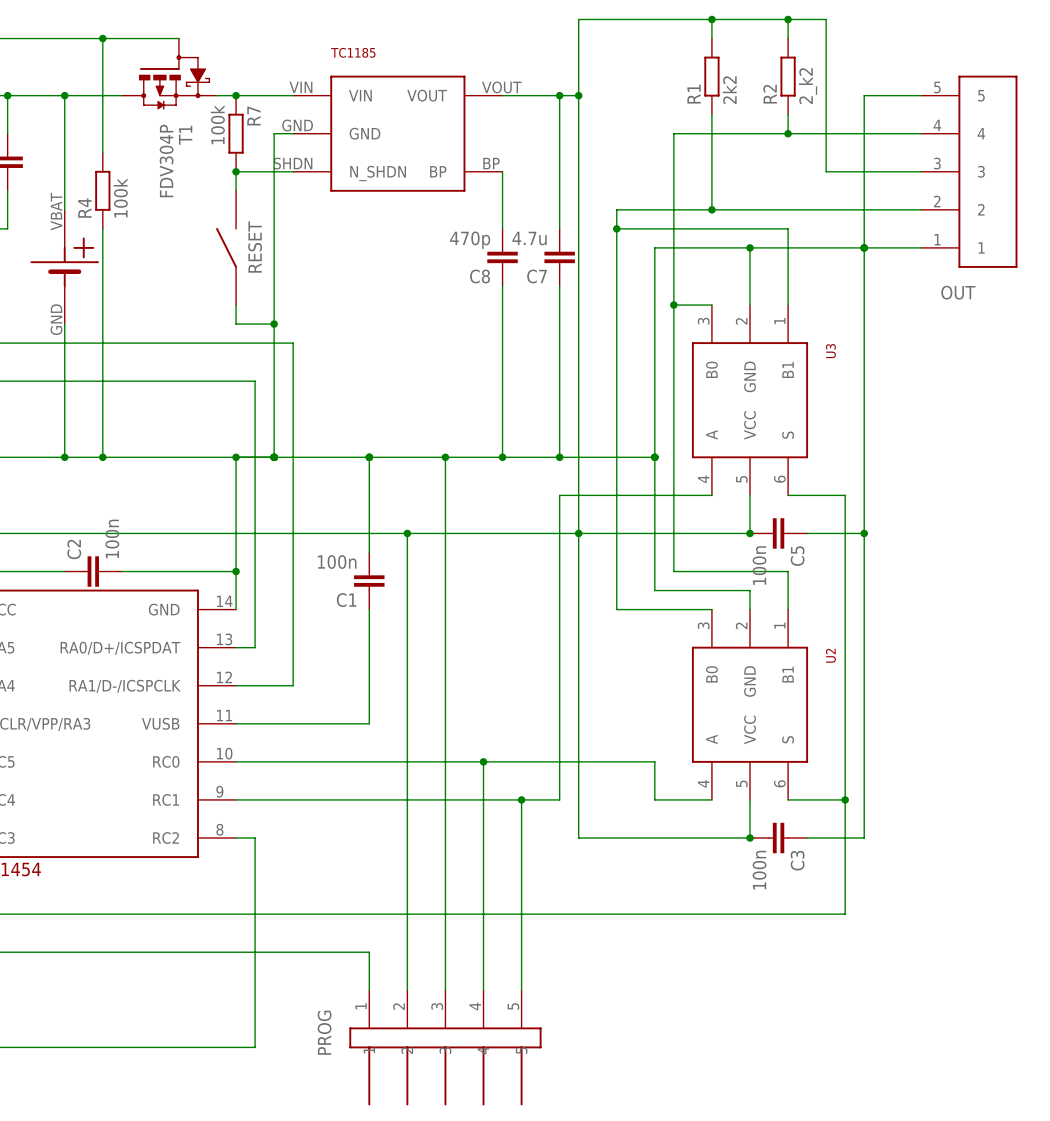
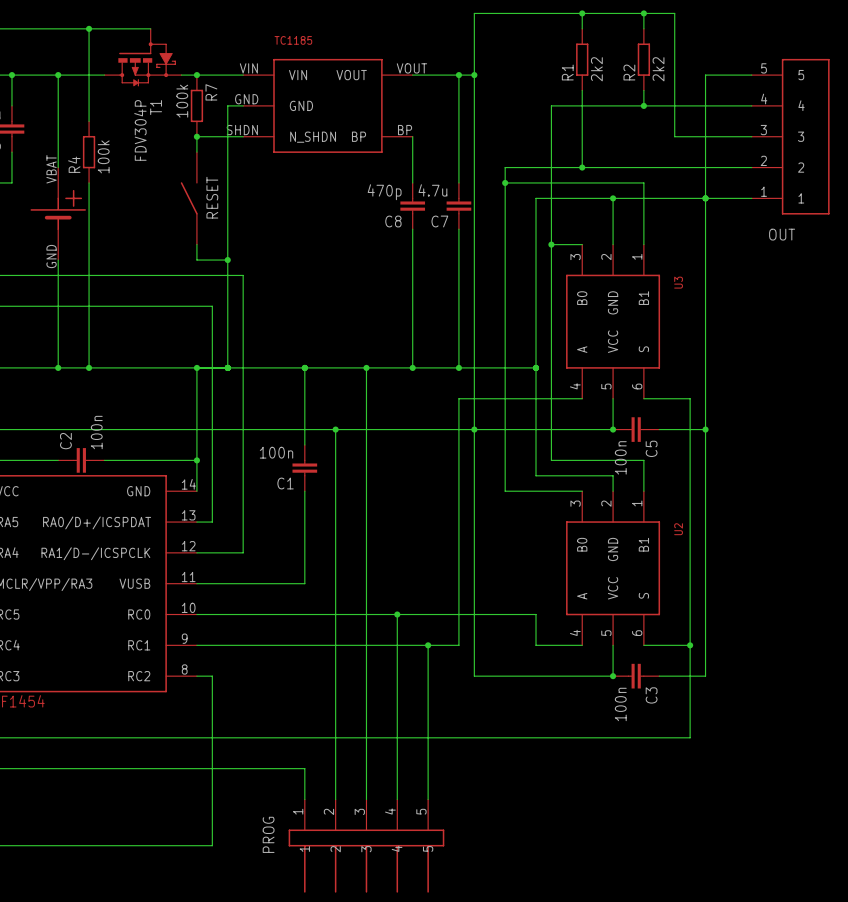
R2 value: 2_k2 (808, 86) -> 2k2 (658, 69)

